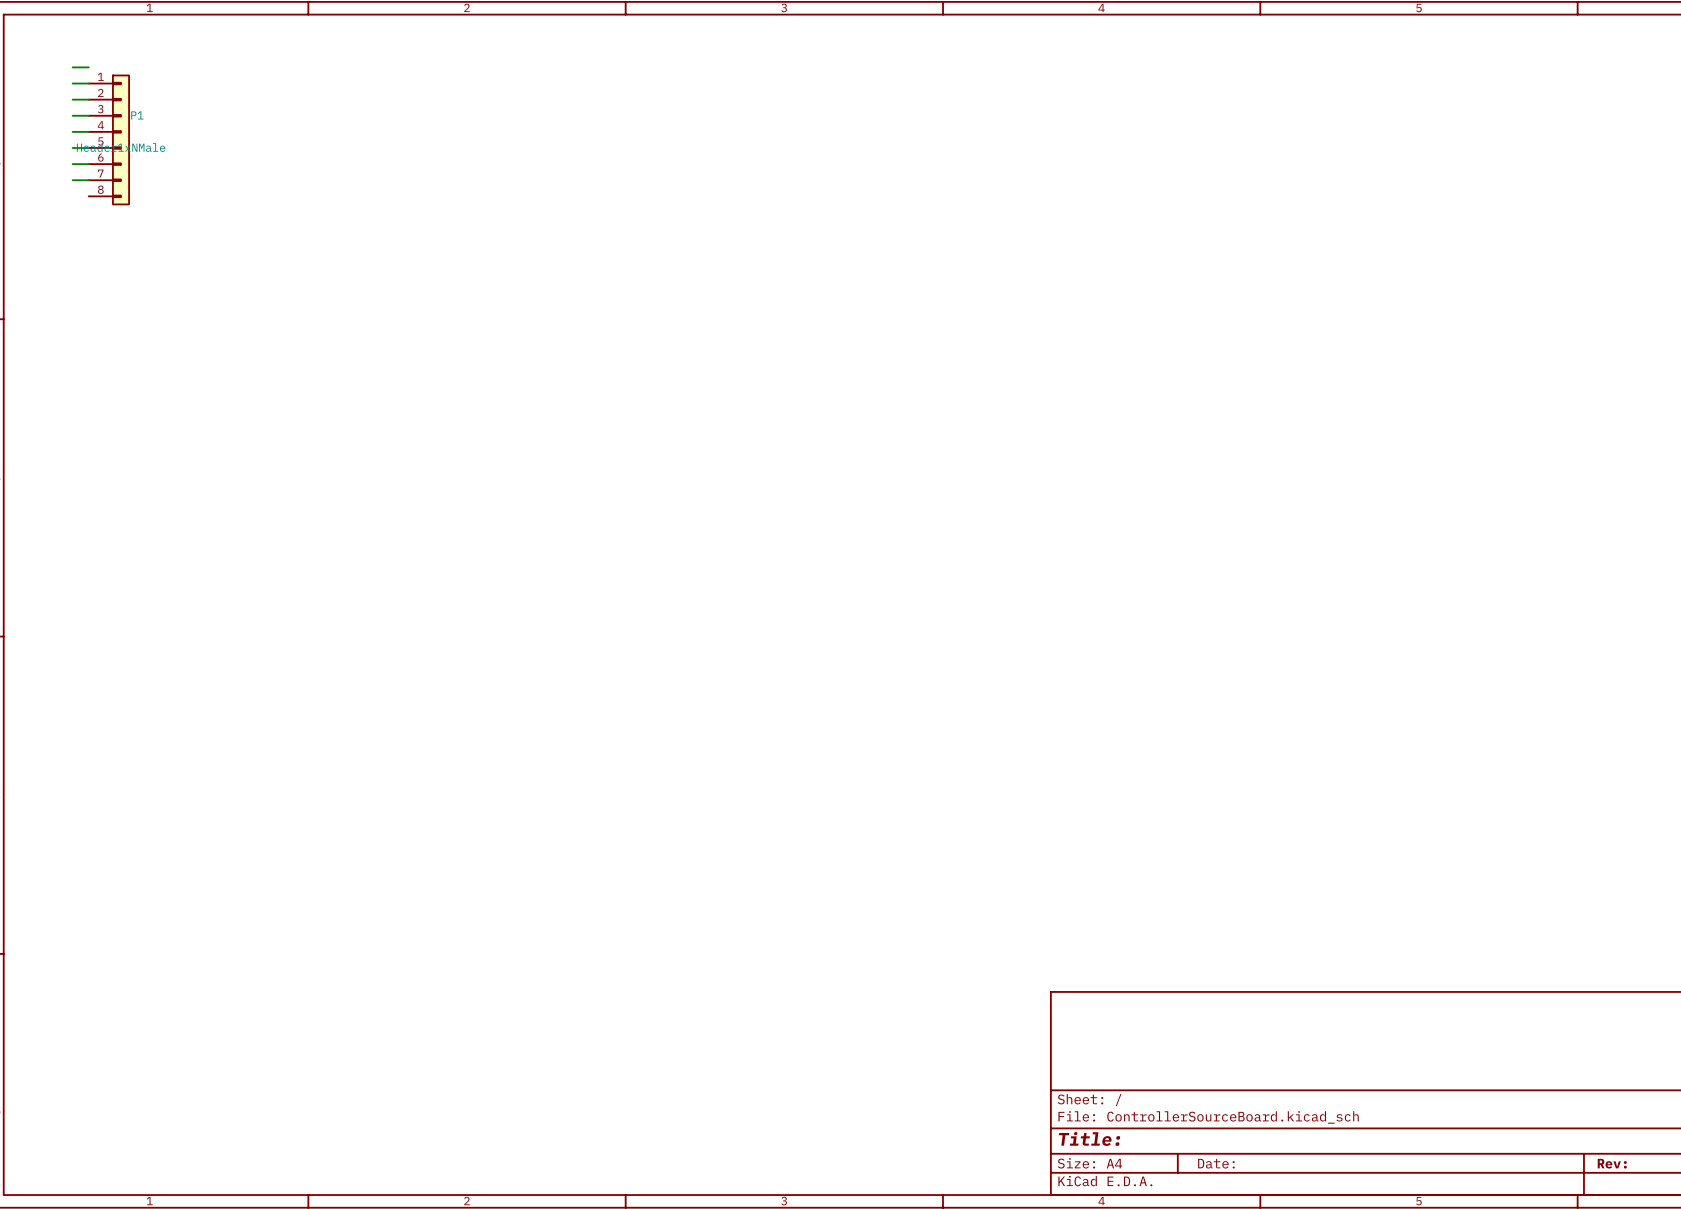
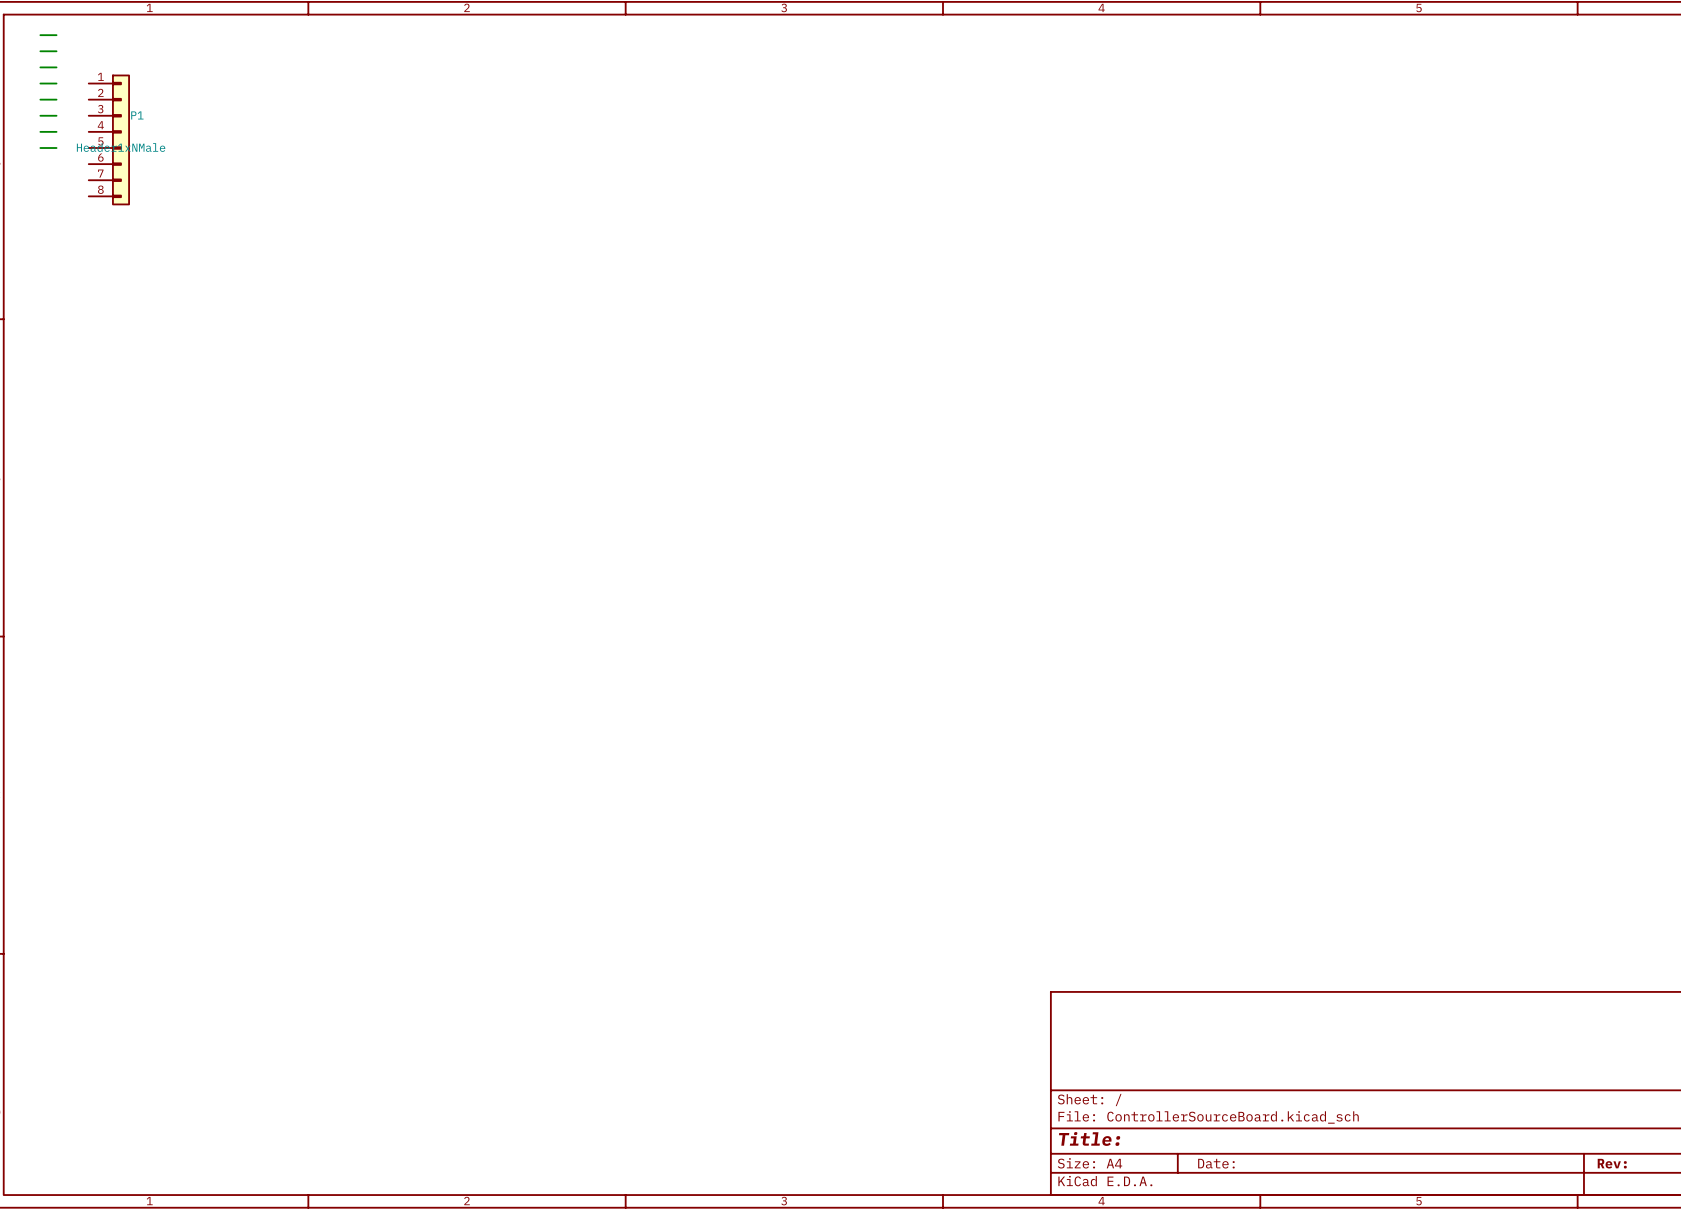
wire: (72, 67) (88, 67) -> (40, 35) (56, 35)
wire: (72, 83) (88, 83) -> (40, 51) (56, 51)
wire: (72, 99) (88, 99) -> (40, 67) (56, 67)
wire: (72, 115) (88, 115) -> (40, 83) (56, 83)
wire: (72, 131) (88, 131) -> (40, 99) (56, 99)
wire: (72, 148) (88, 148) -> (40, 115) (56, 115)
wire: (72, 164) (88, 164) -> (40, 131) (56, 131)
wire: (72, 180) (88, 180) -> (40, 148) (56, 148)

